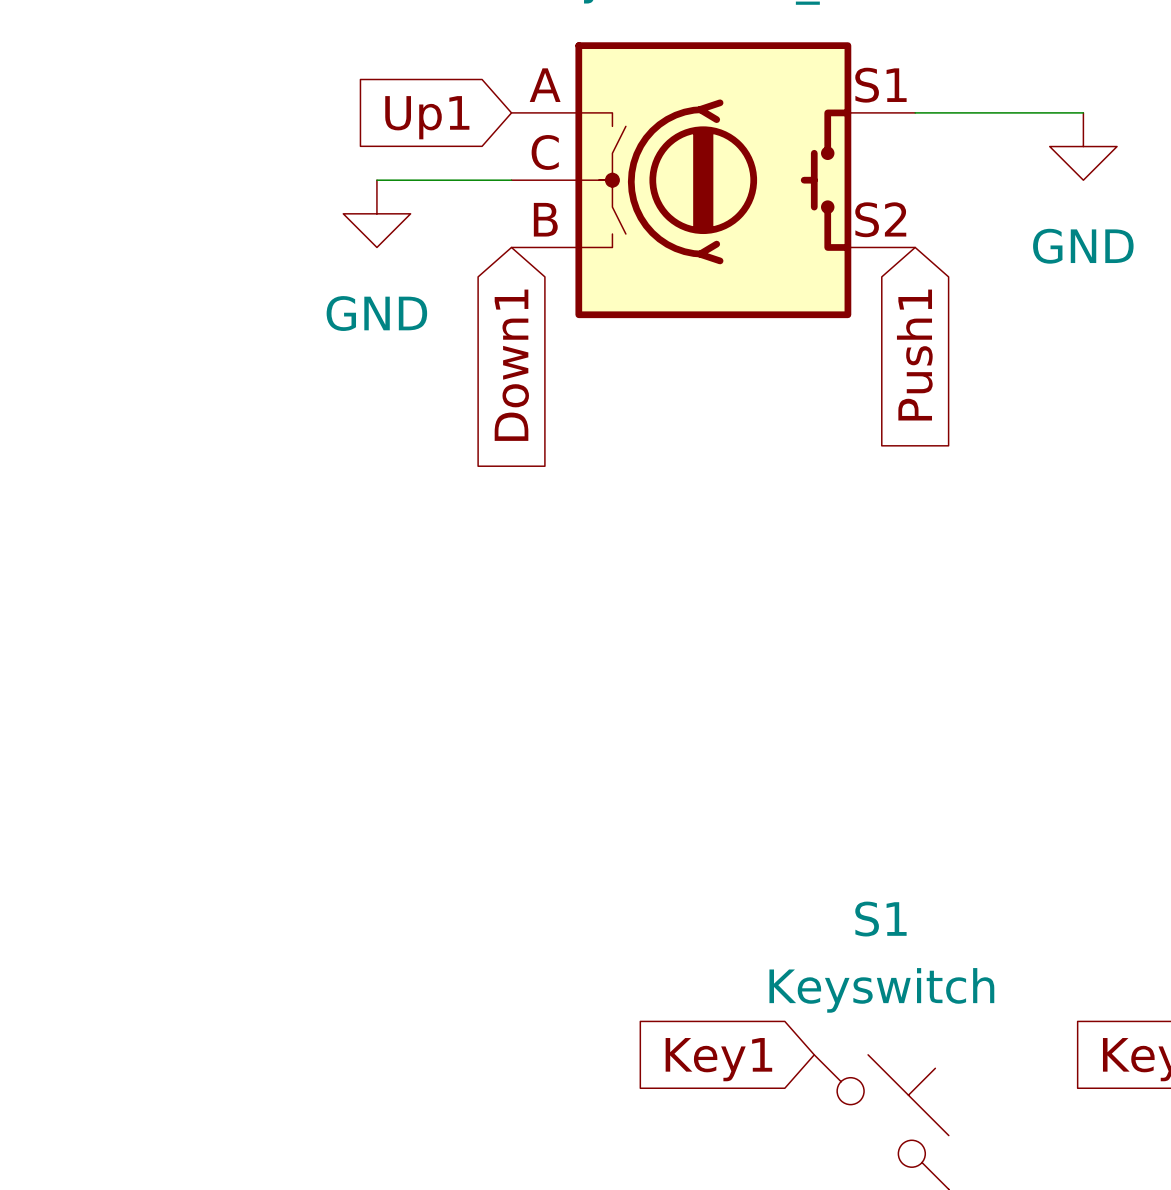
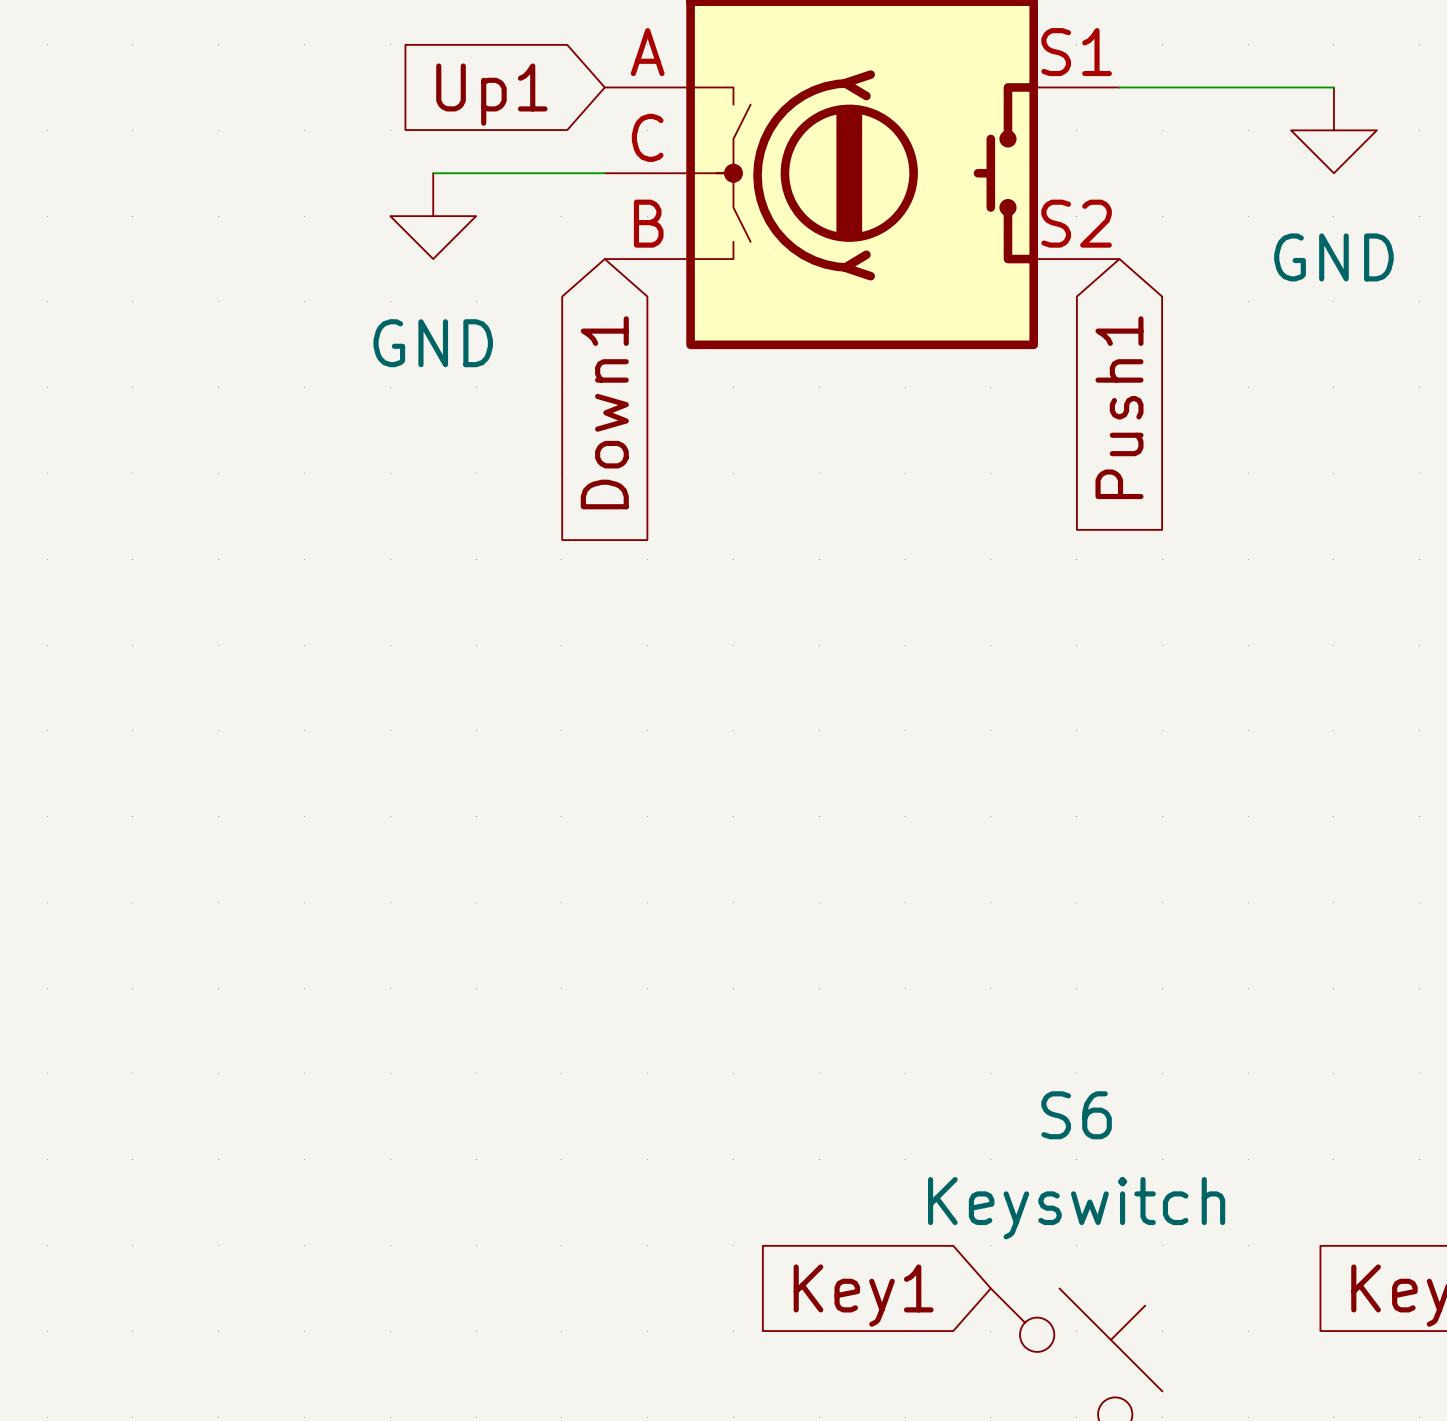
S1 name: S1 (880, 919) -> S6 (1076, 1115)

